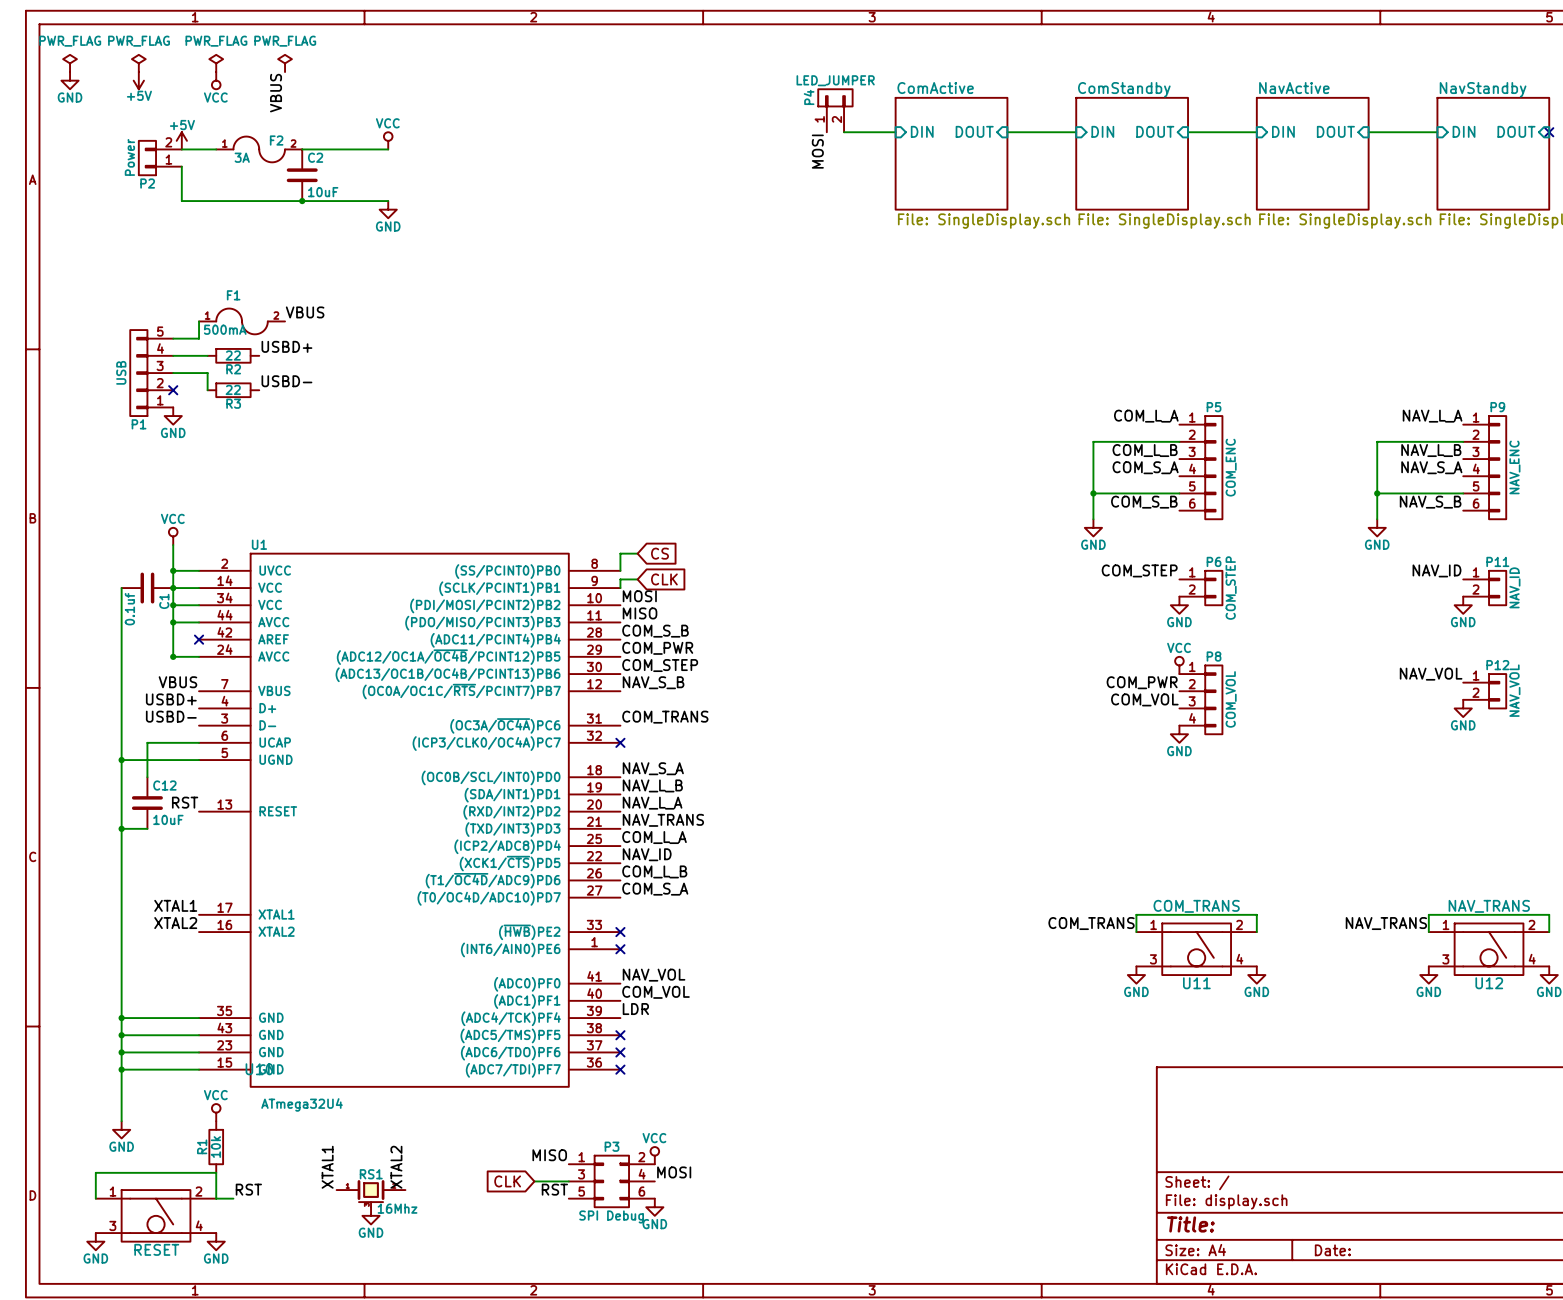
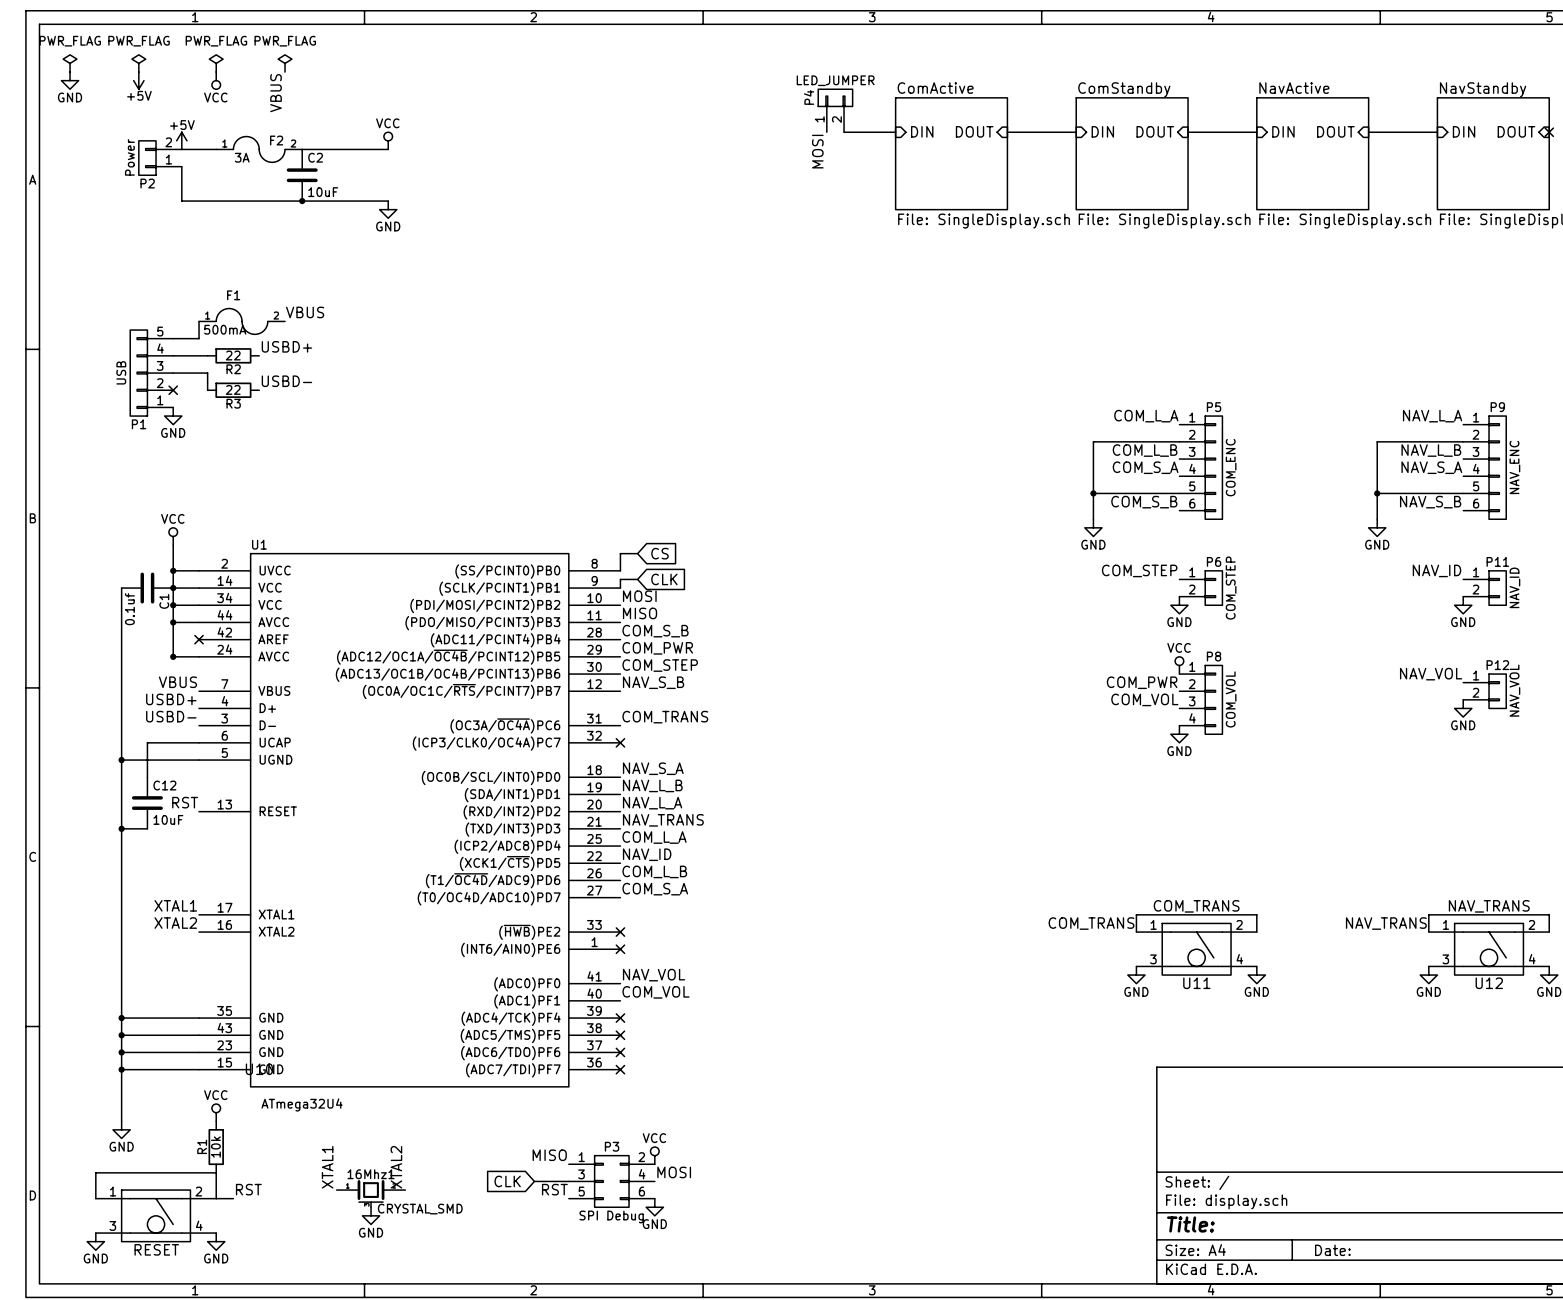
label: LDR (635, 1009) -> none
no-connect mark: none -> (620, 1018)
RS1 name: RS1 (371, 1174) -> 16Mhz1 (371, 1174)
RS1 value: 16Mhz (397, 1208) -> CRYSTAL_SMD (420, 1209)

